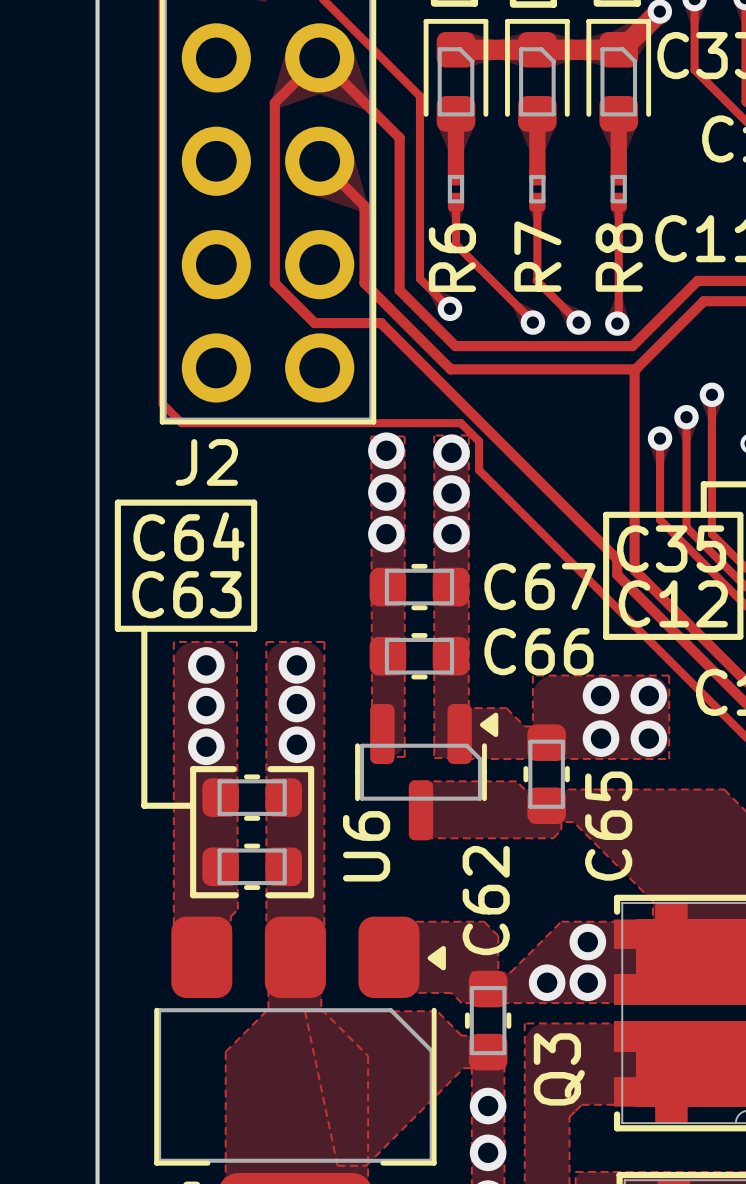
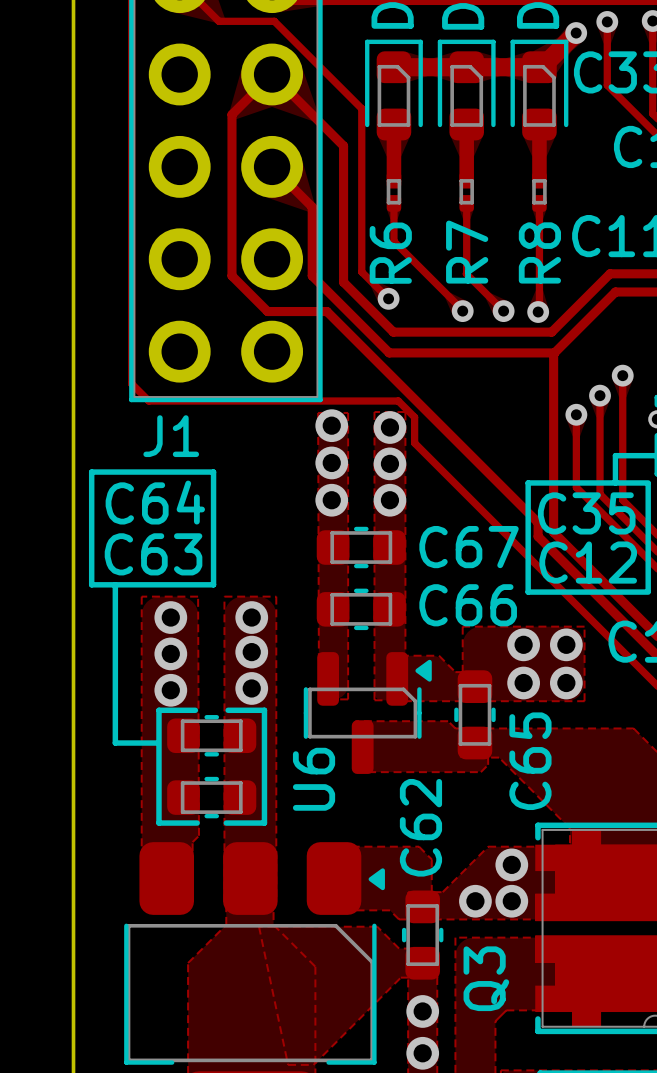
J2 name: J2 (206, 462) -> J1 (171, 436)

